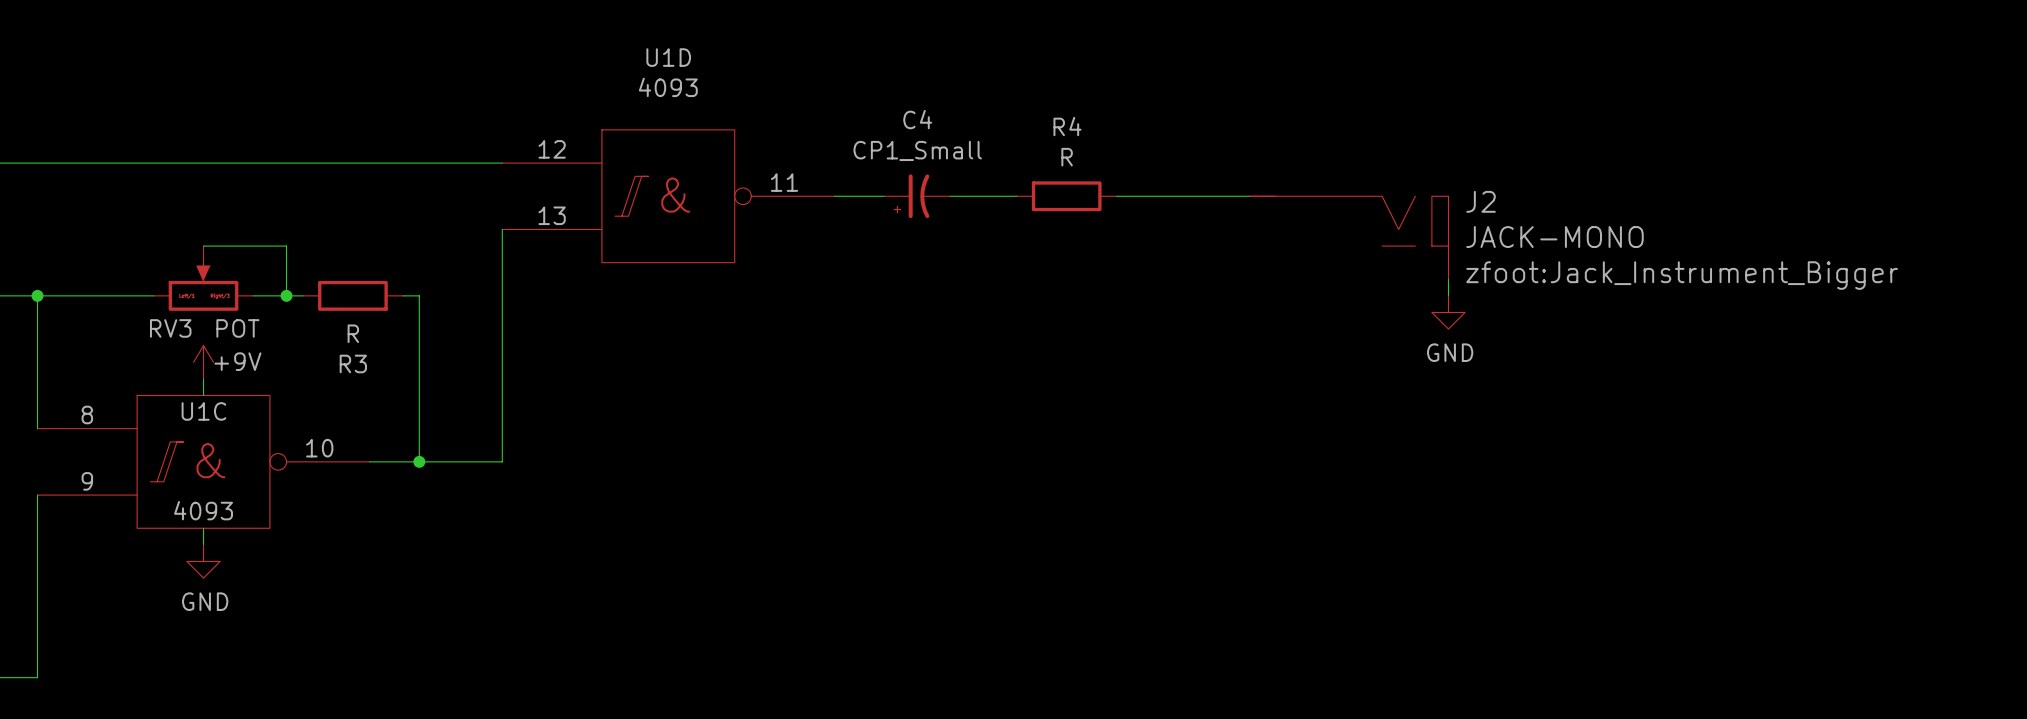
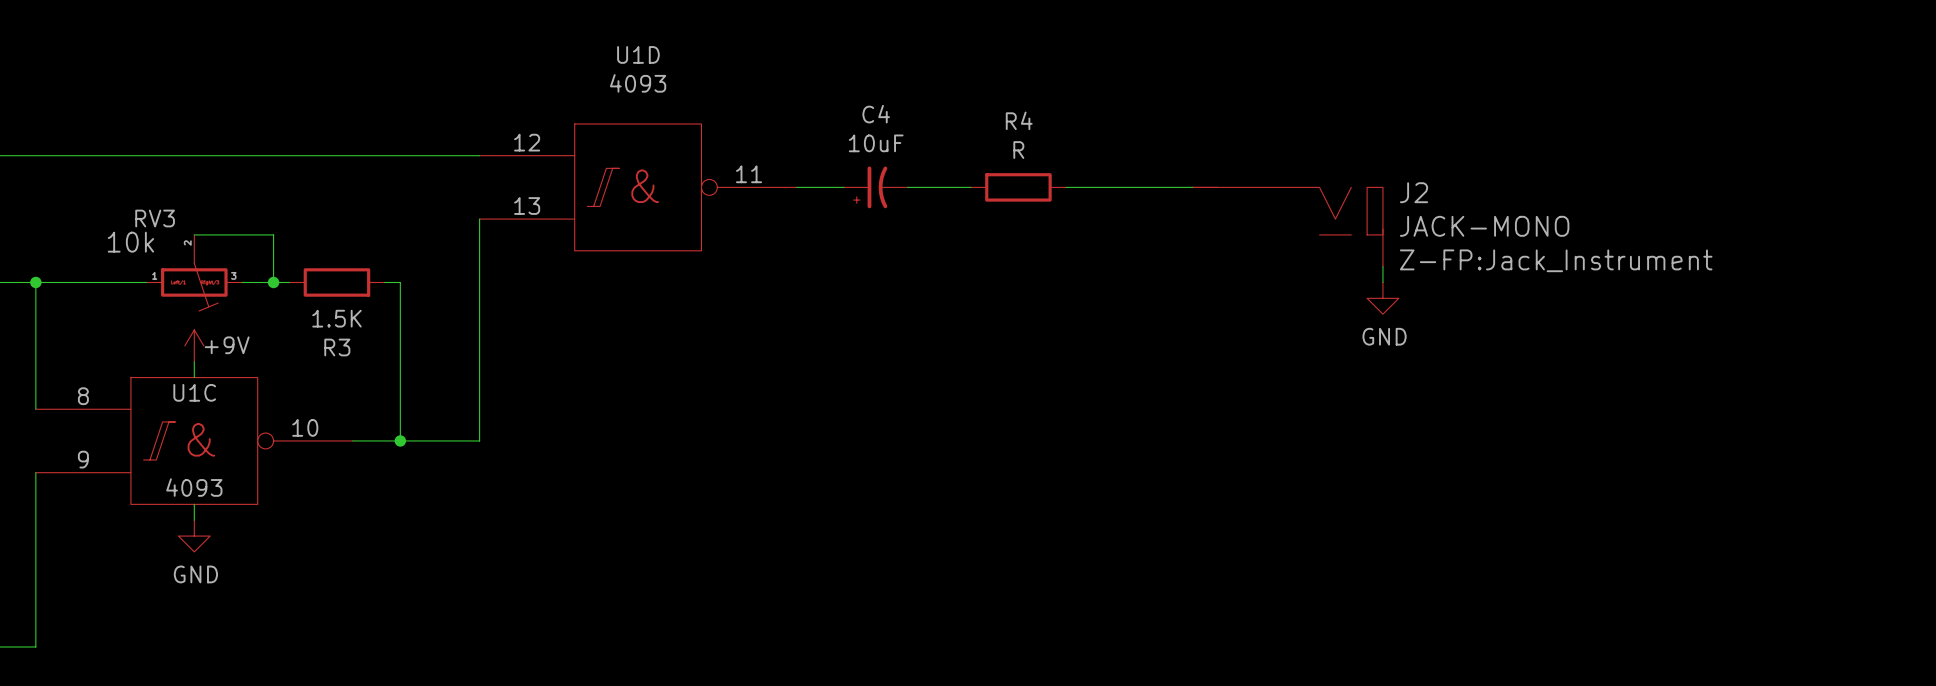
C4 value: CP1_Small (917, 150) -> 10uF (876, 143)
RV3 symbol: [153, 246, 254, 311] -> [146, 234, 242, 312]
RV3 text: none -> 10k (130, 242)
J2 text: zfoot:Jack_Instrument_Bigger (1682, 275) -> Z-FP:Jack_Instrument (1556, 260)
RV3 name position: RV3 (170, 328) -> RV3 (155, 218)
RV3 value: POT (237, 328) -> none
R3 value: R (353, 333) -> 1.5K (336, 318)

